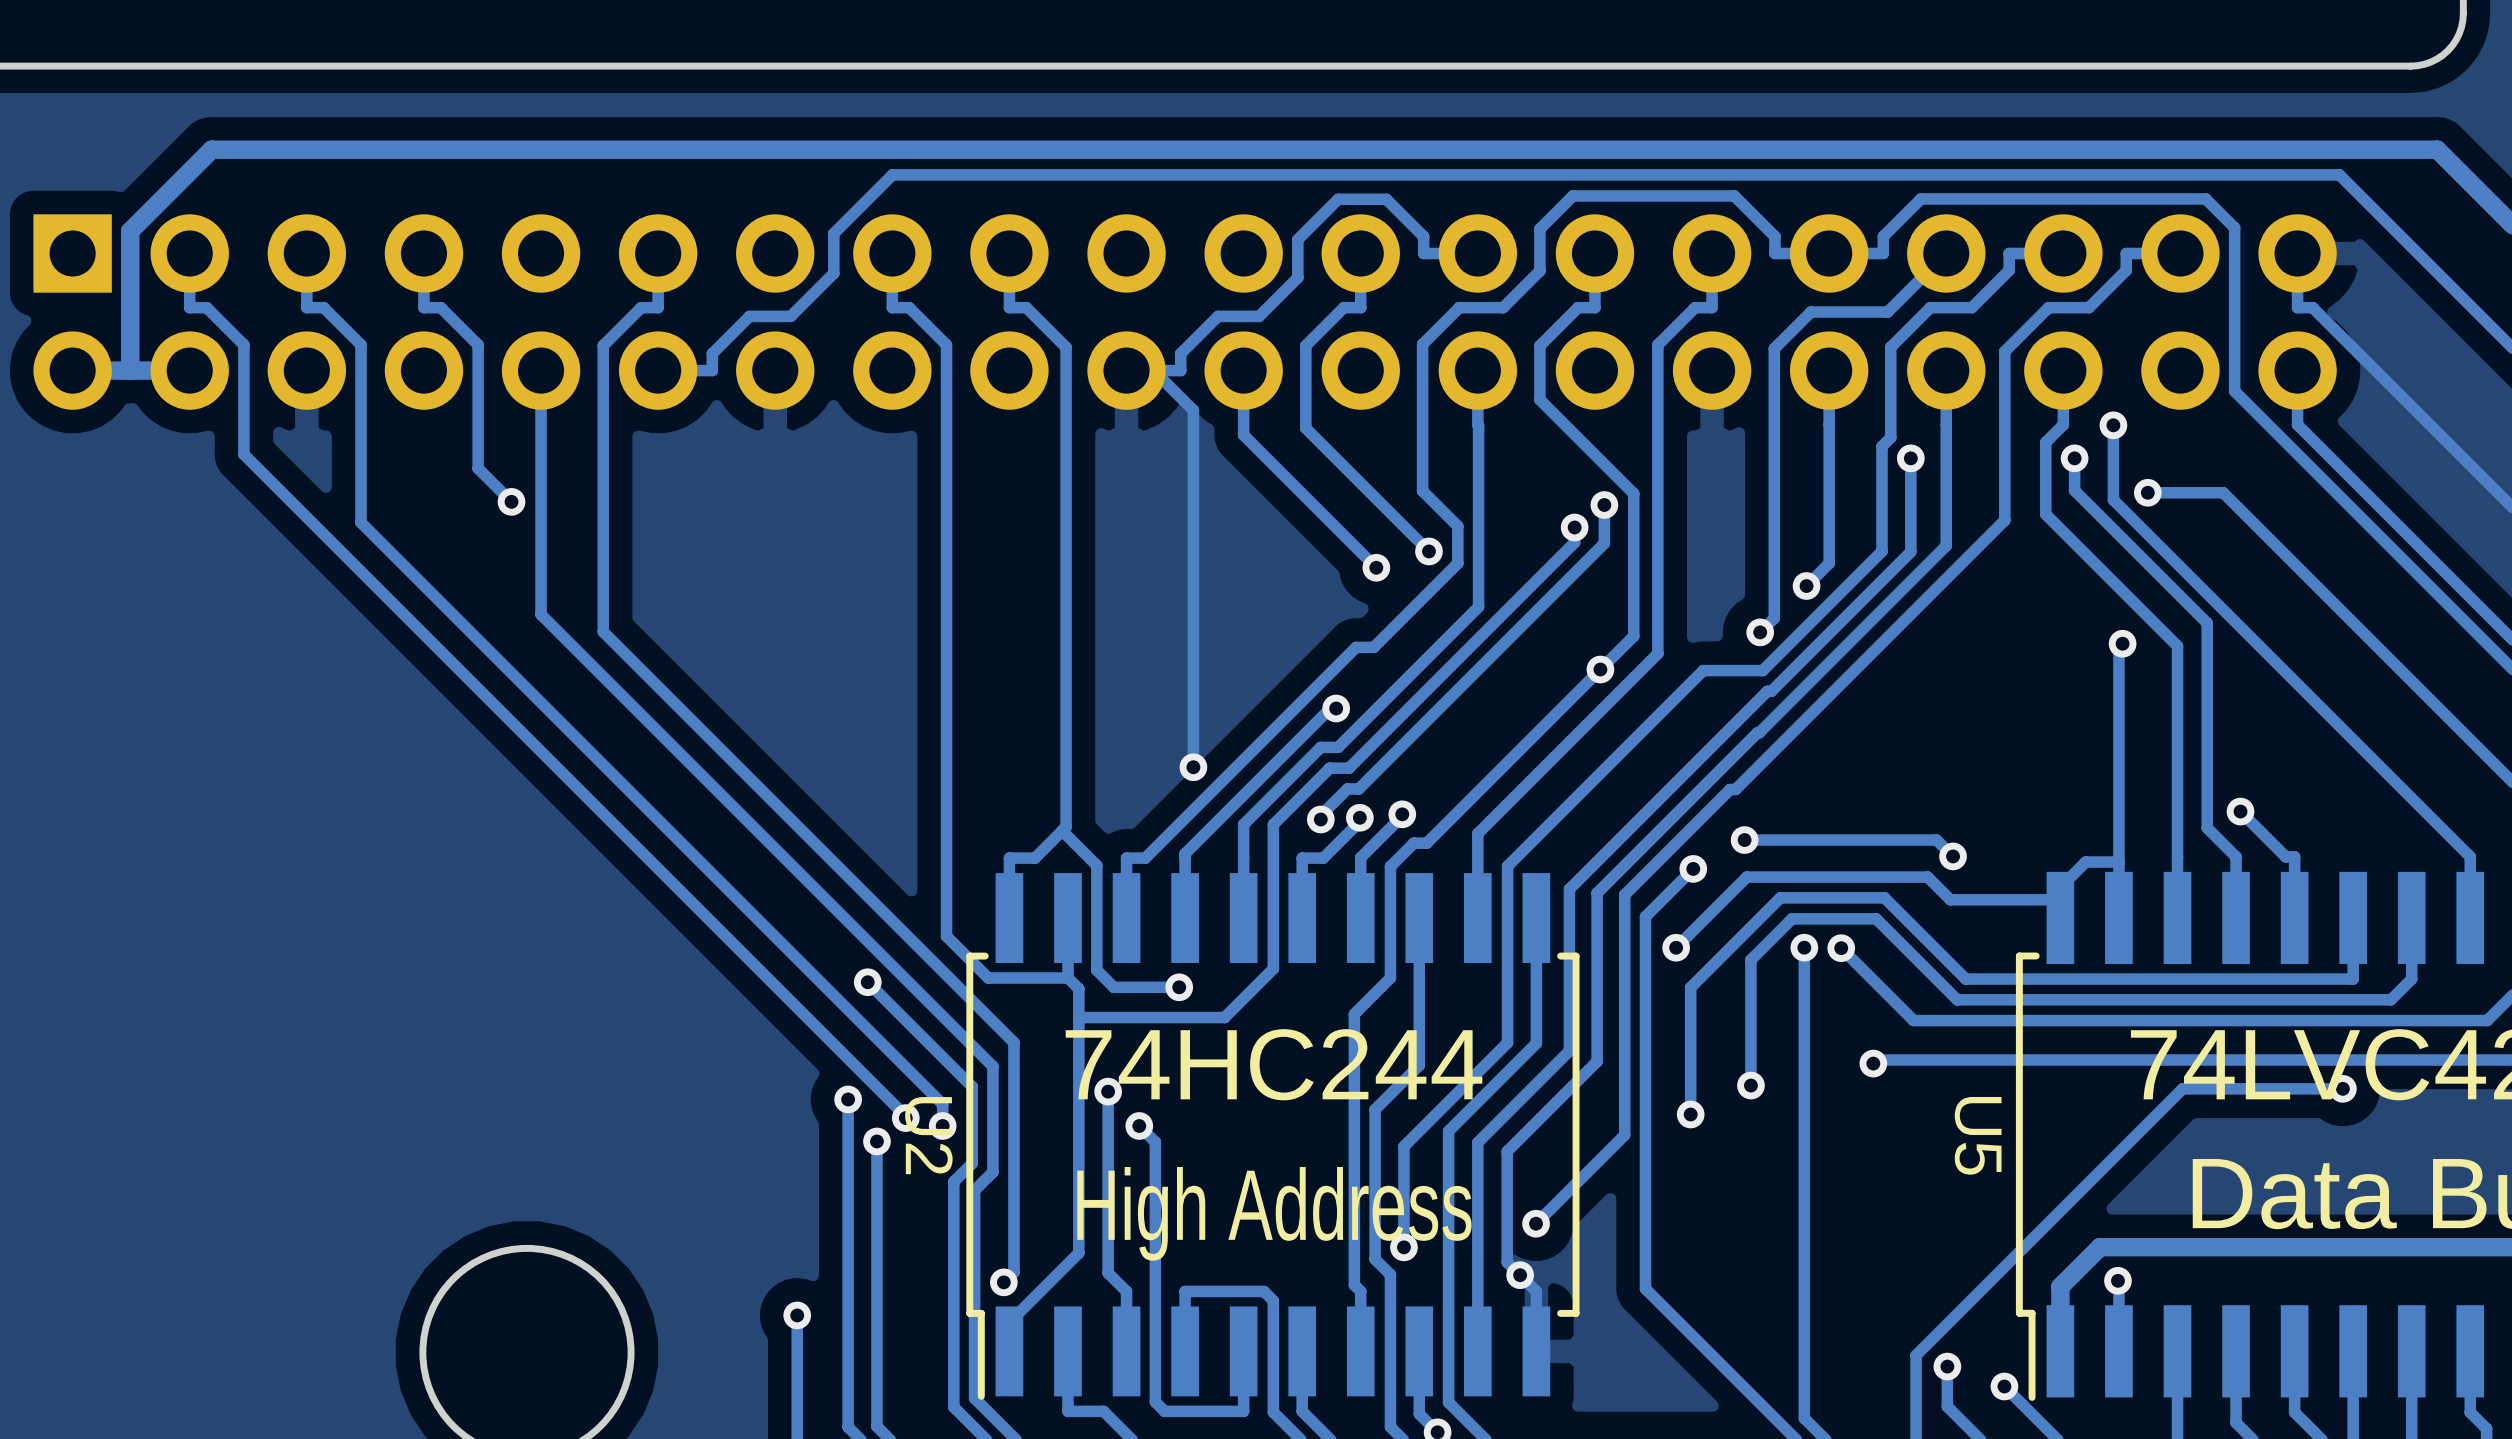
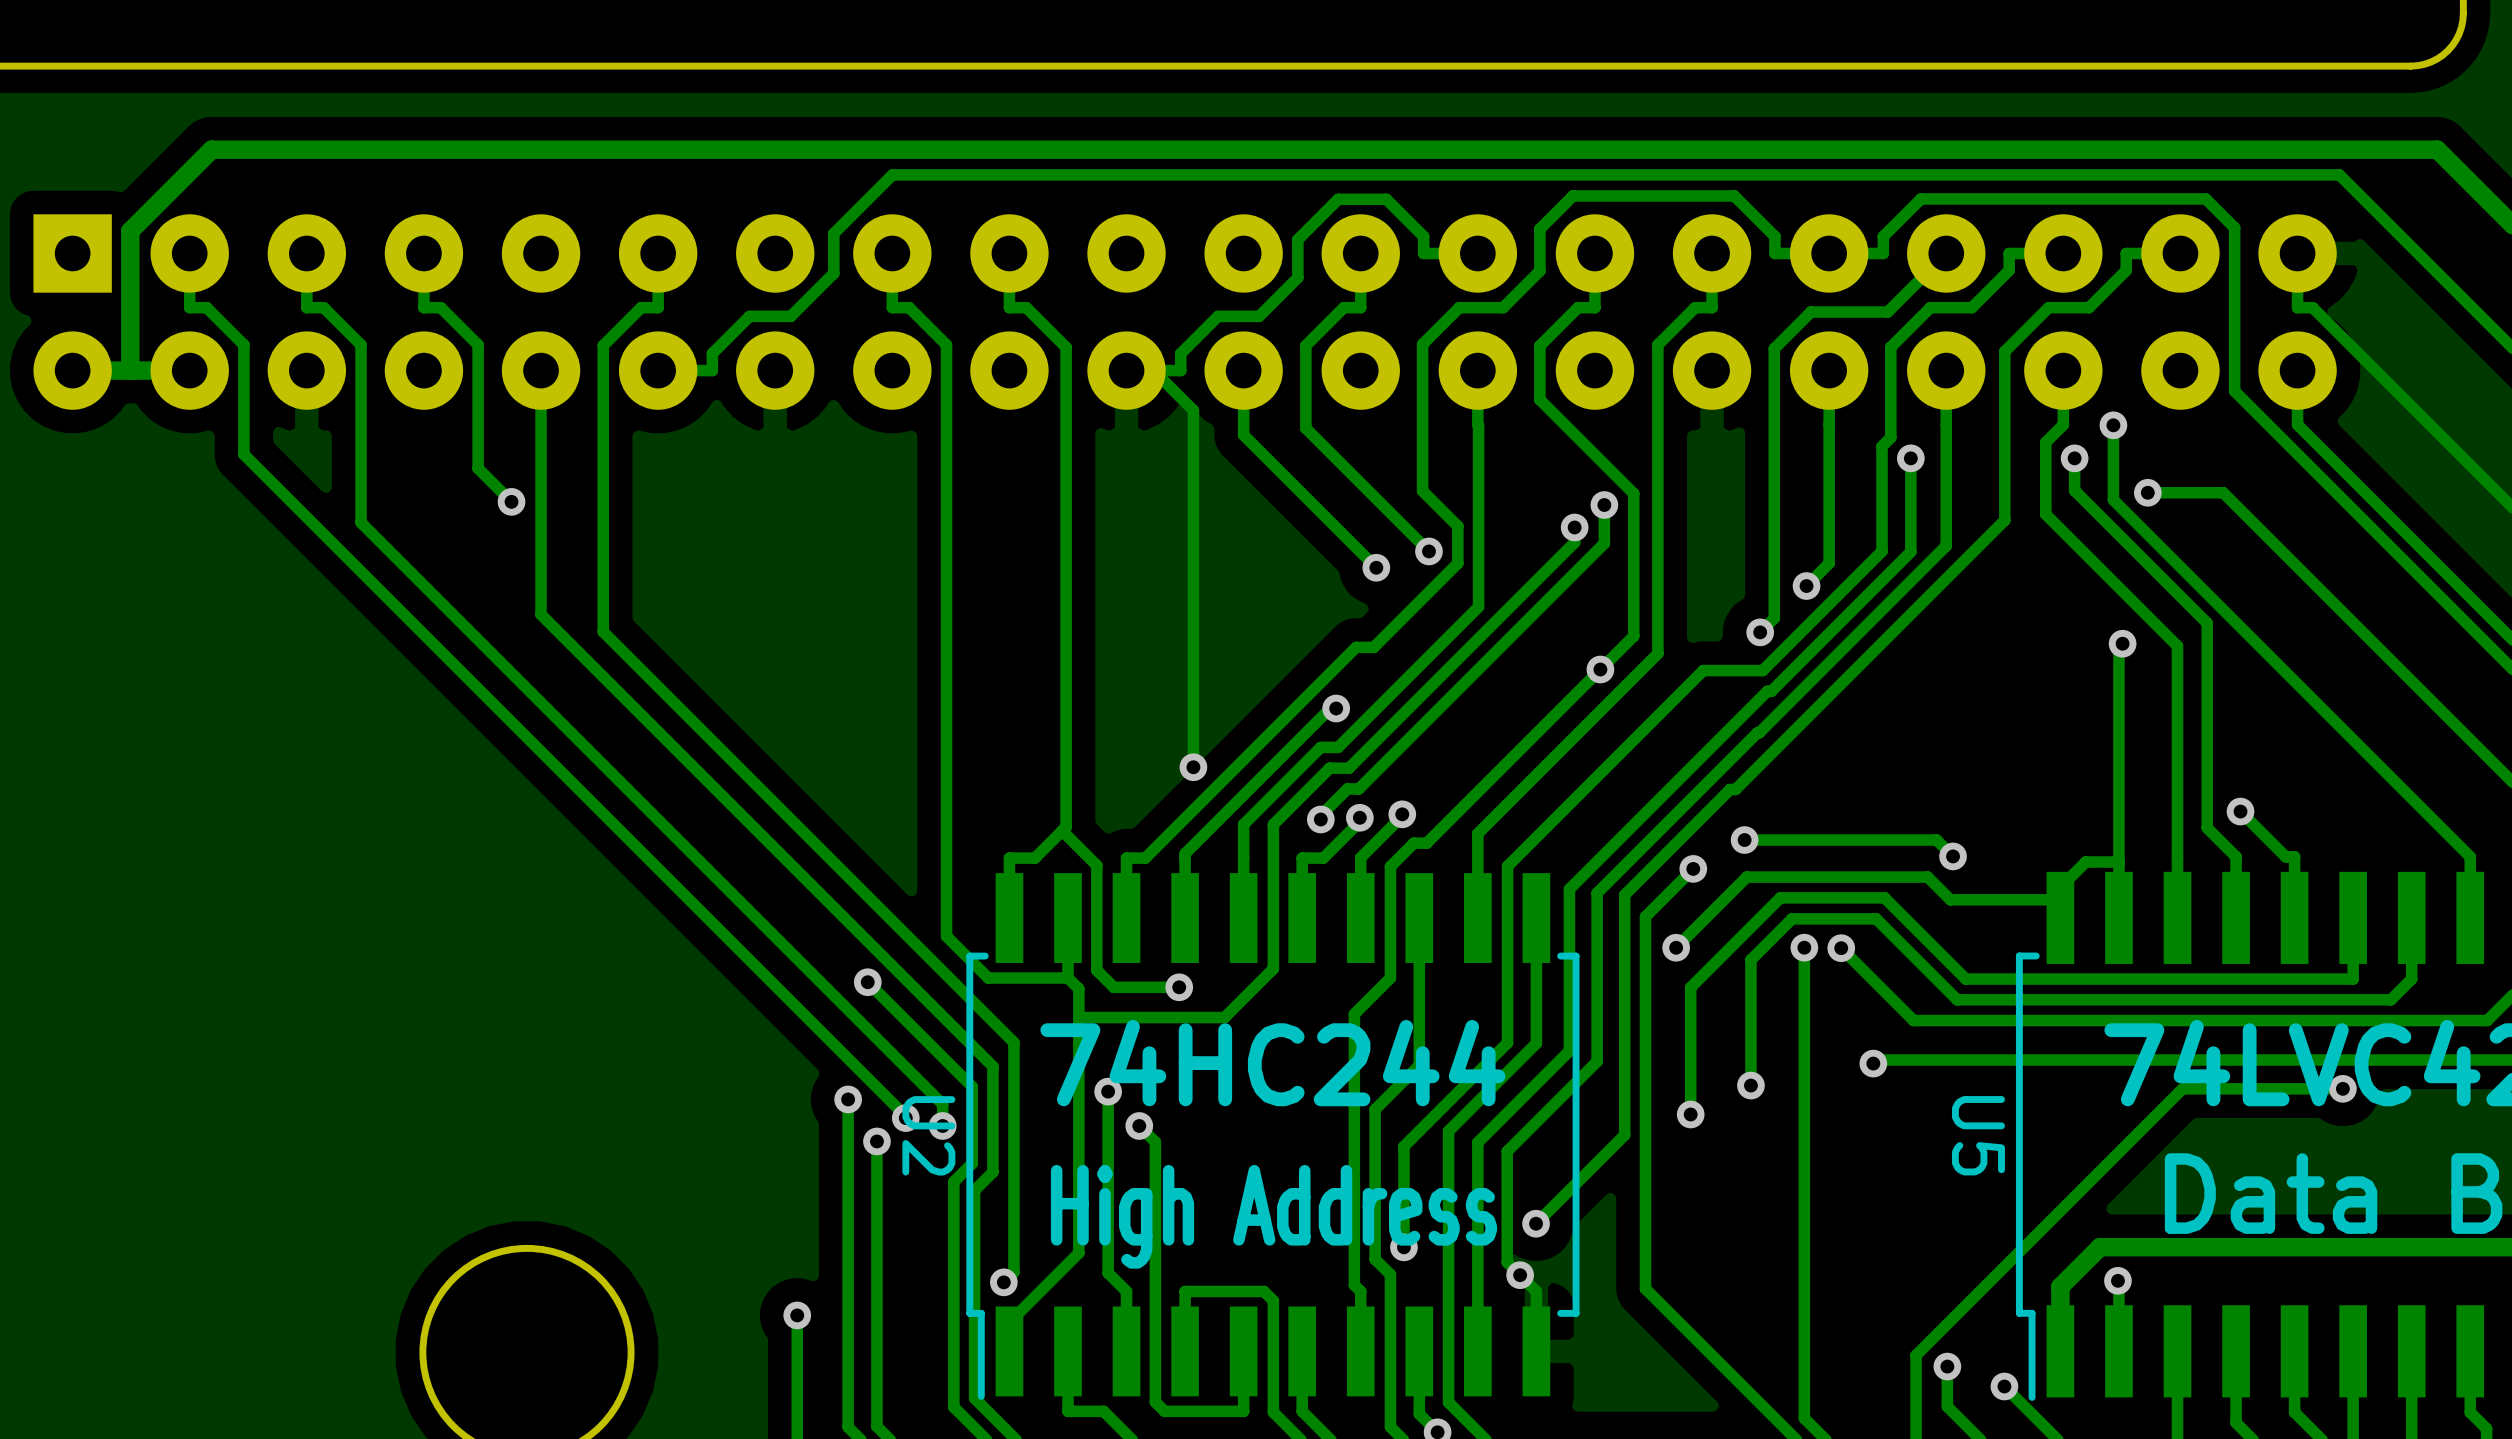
part footprint: [33, 214, 2337, 410] -> [33, 214, 2337, 410]

